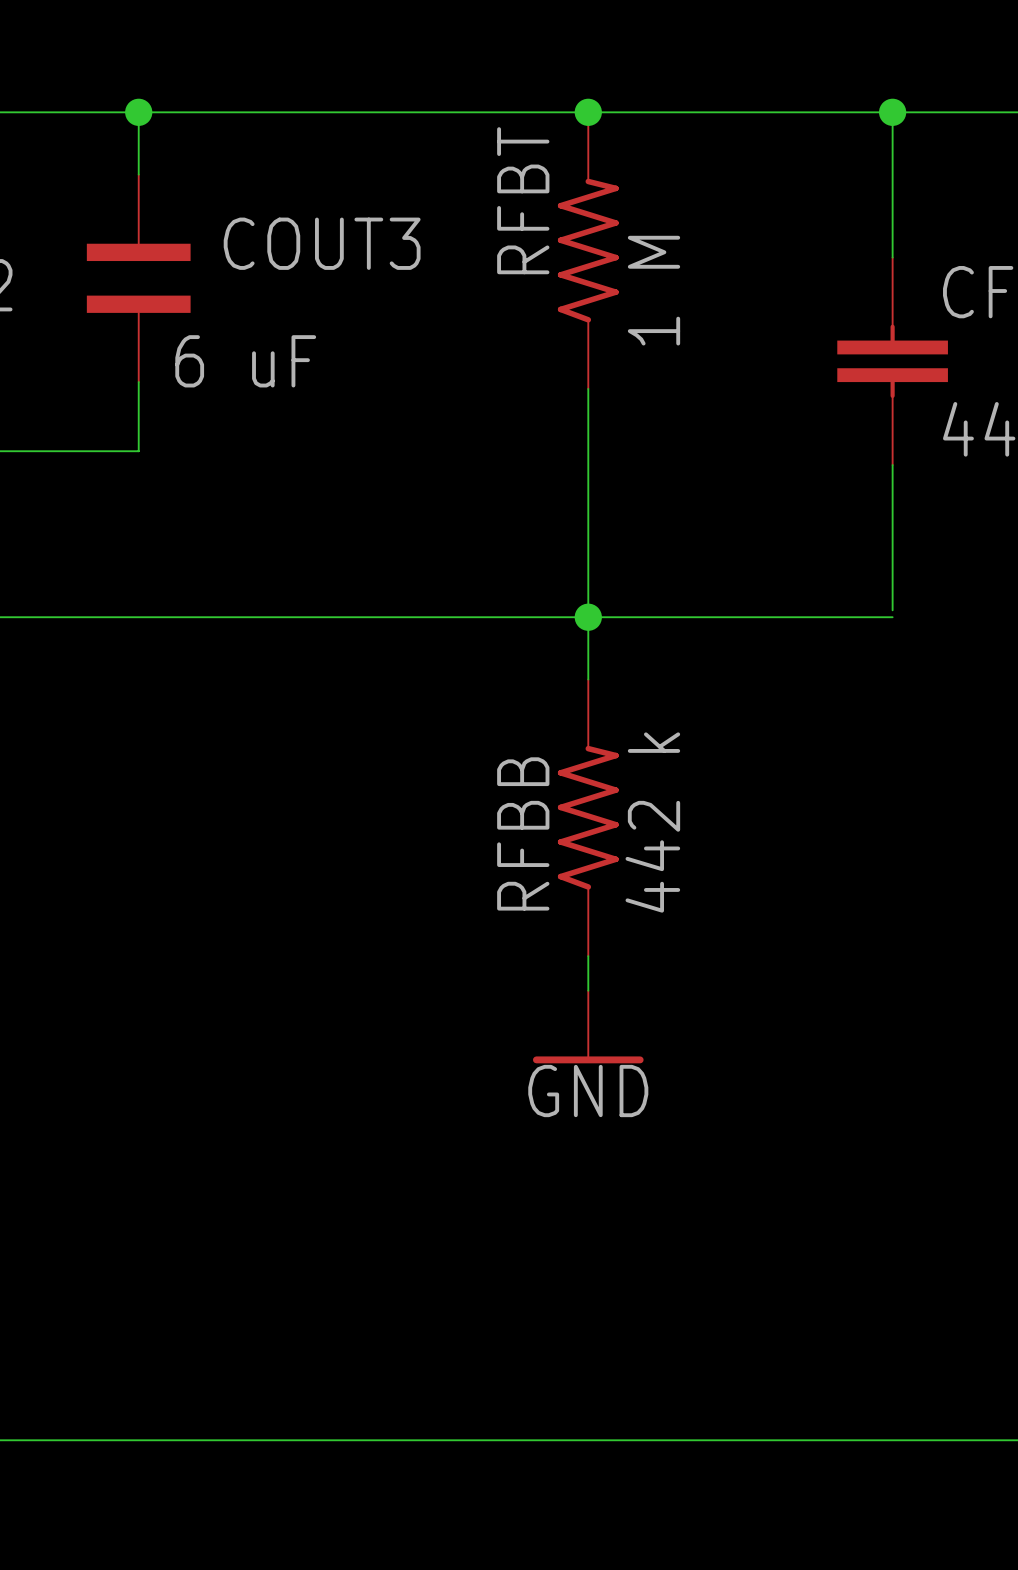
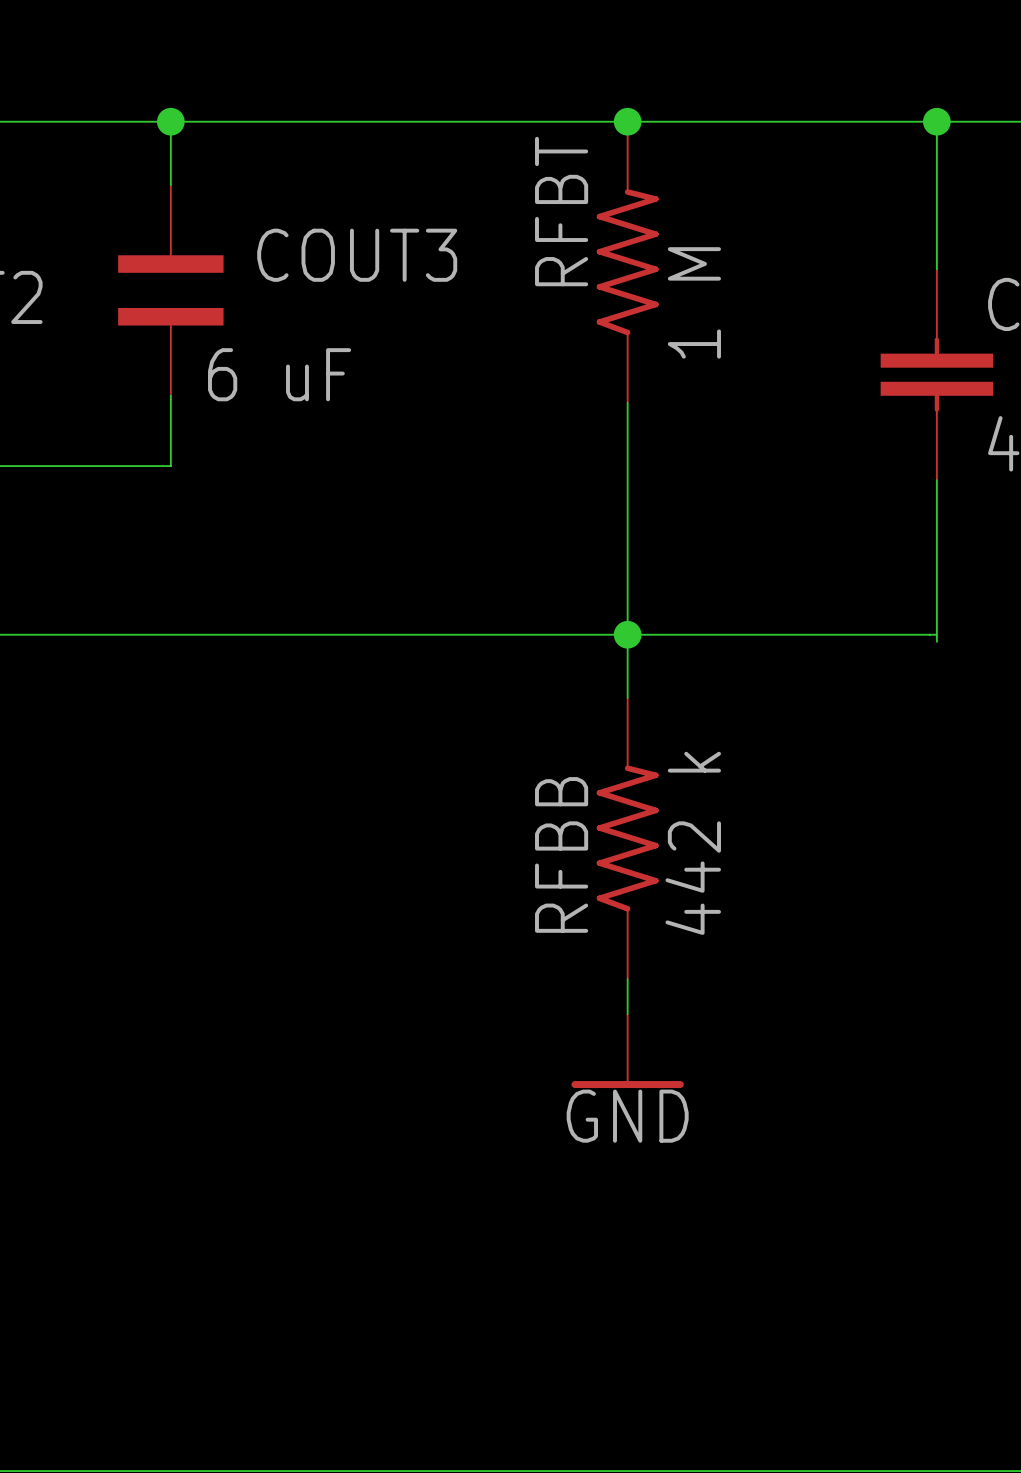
wire: none -> (936, 627) (936, 641)

